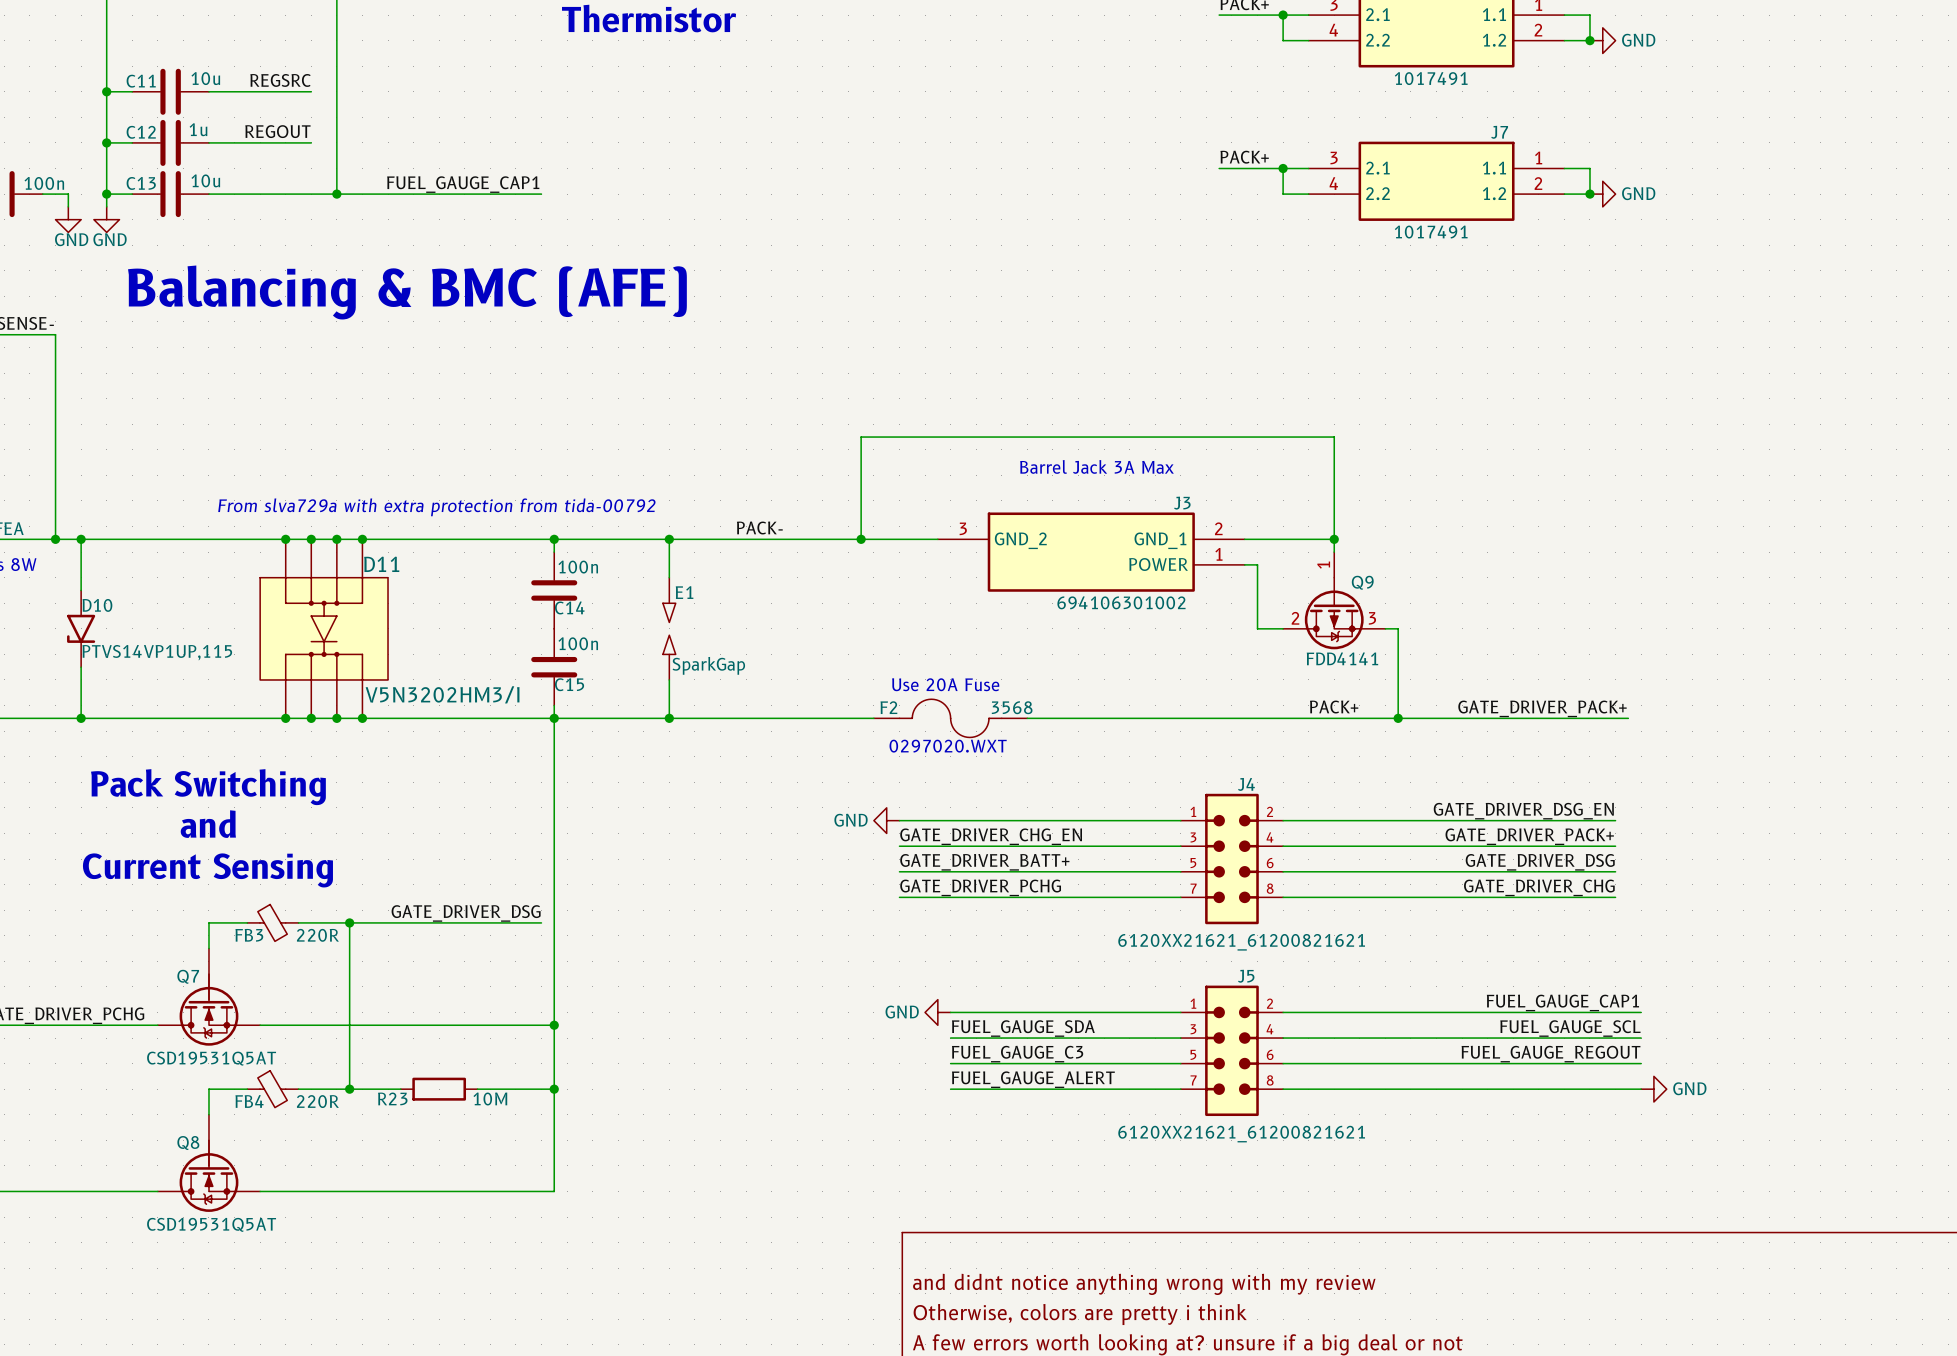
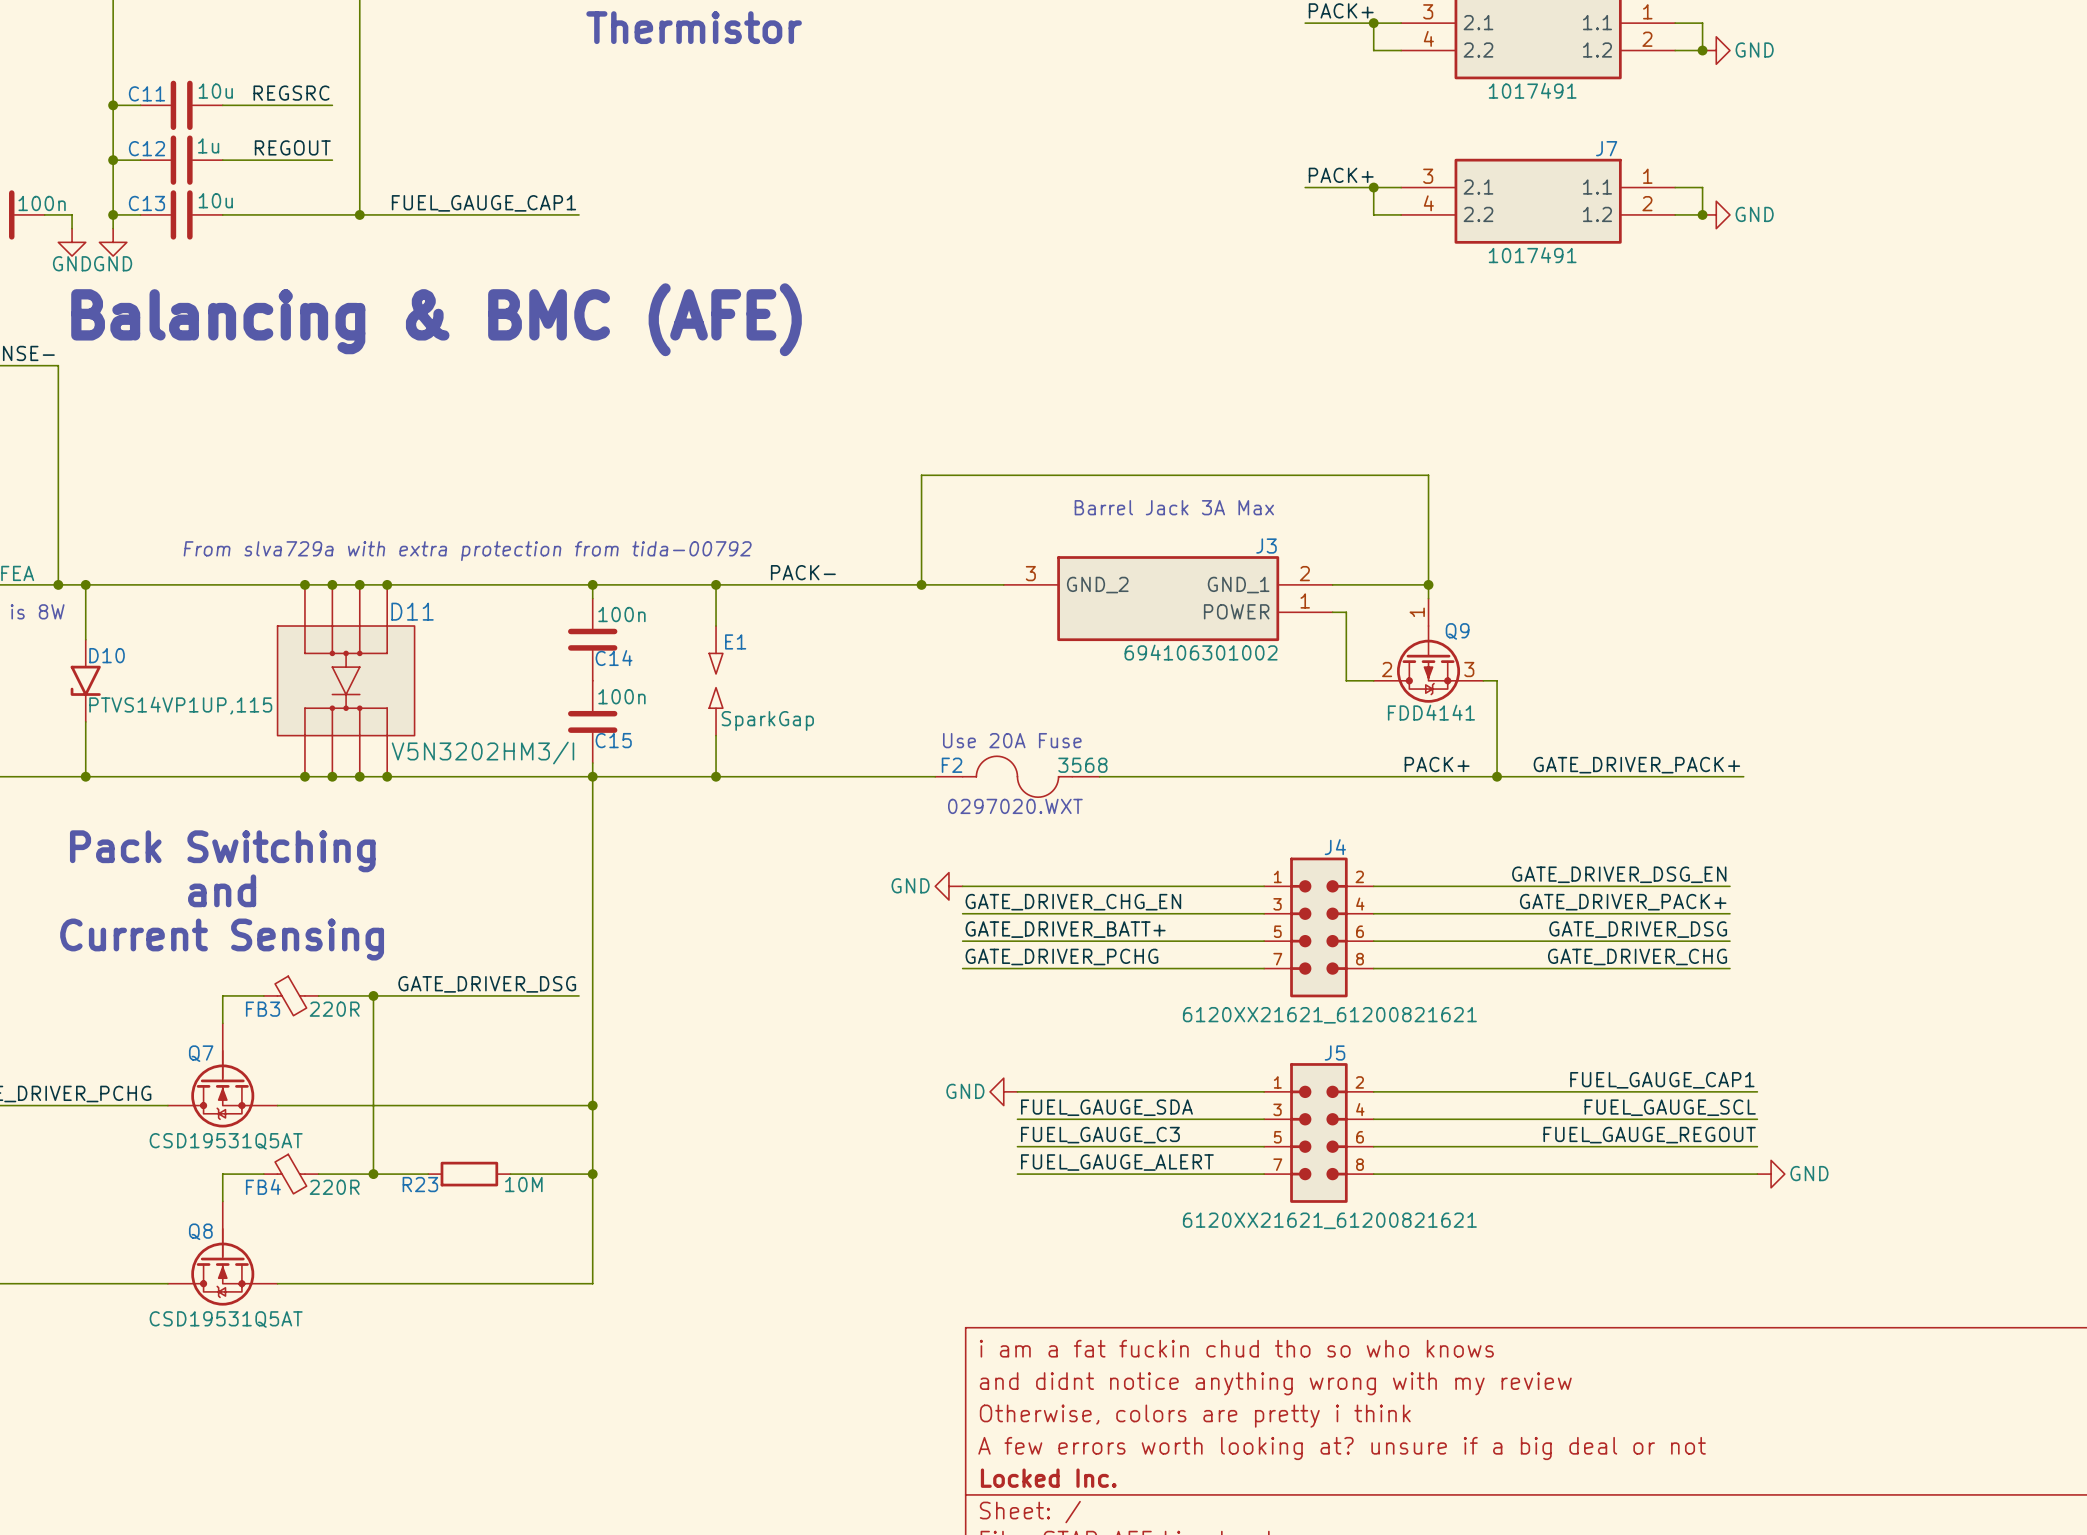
title block: none -> i am a fat fuckin chud tho so who knows (1236, 1348)

